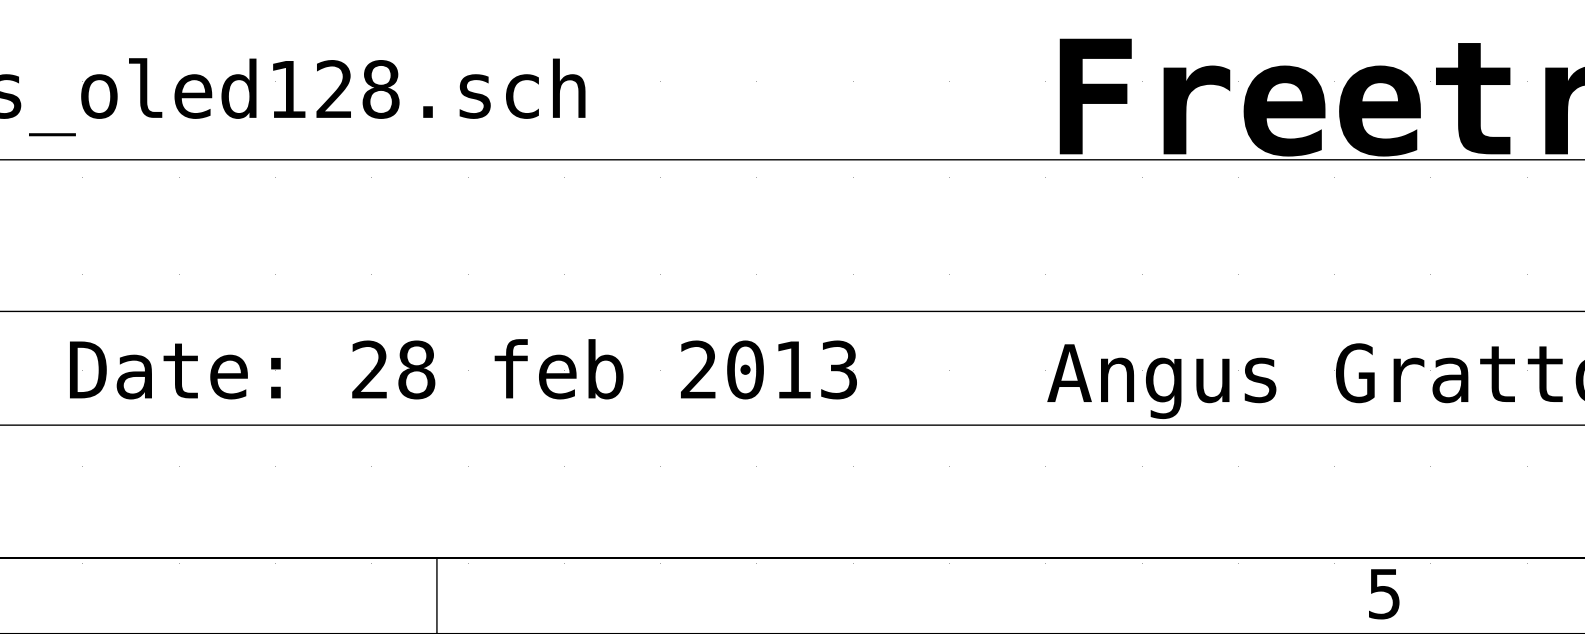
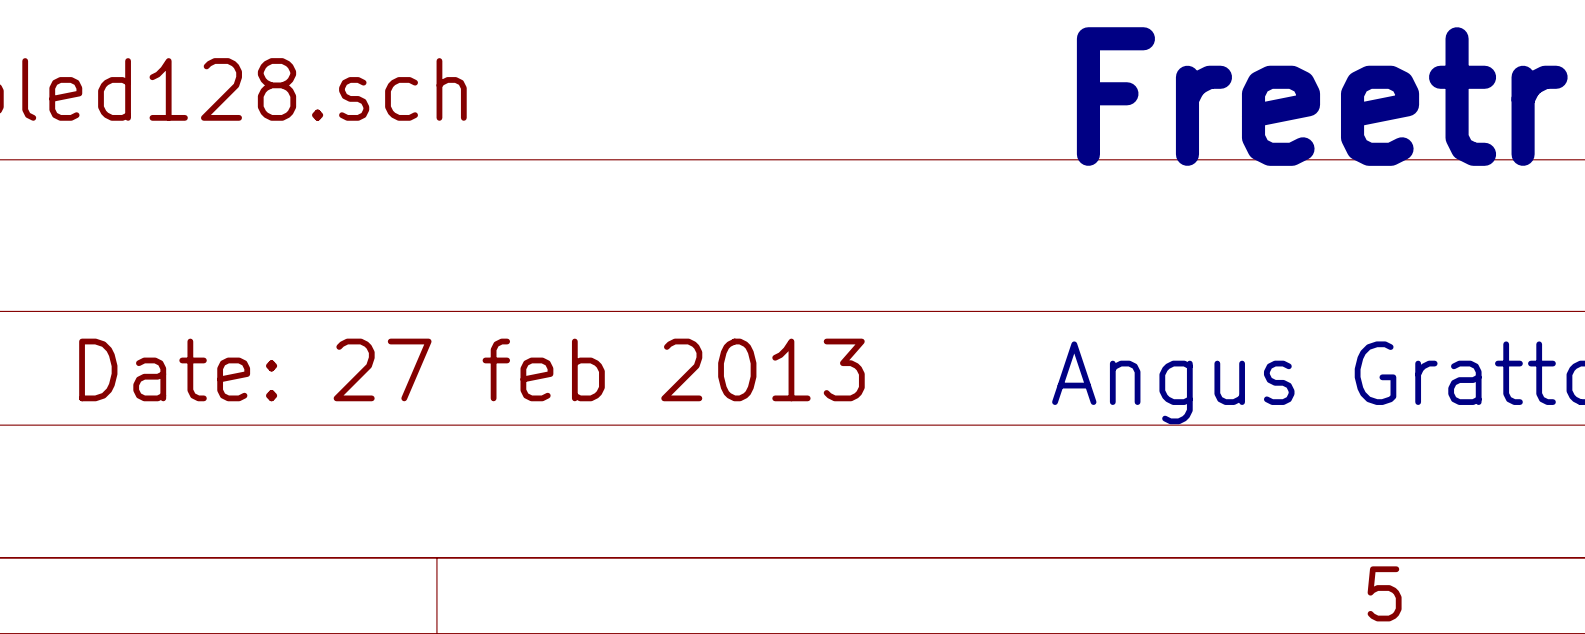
title block: Date: 28 feb 2013 (463, 369) -> Date: 27 feb 2013 (471, 369)

